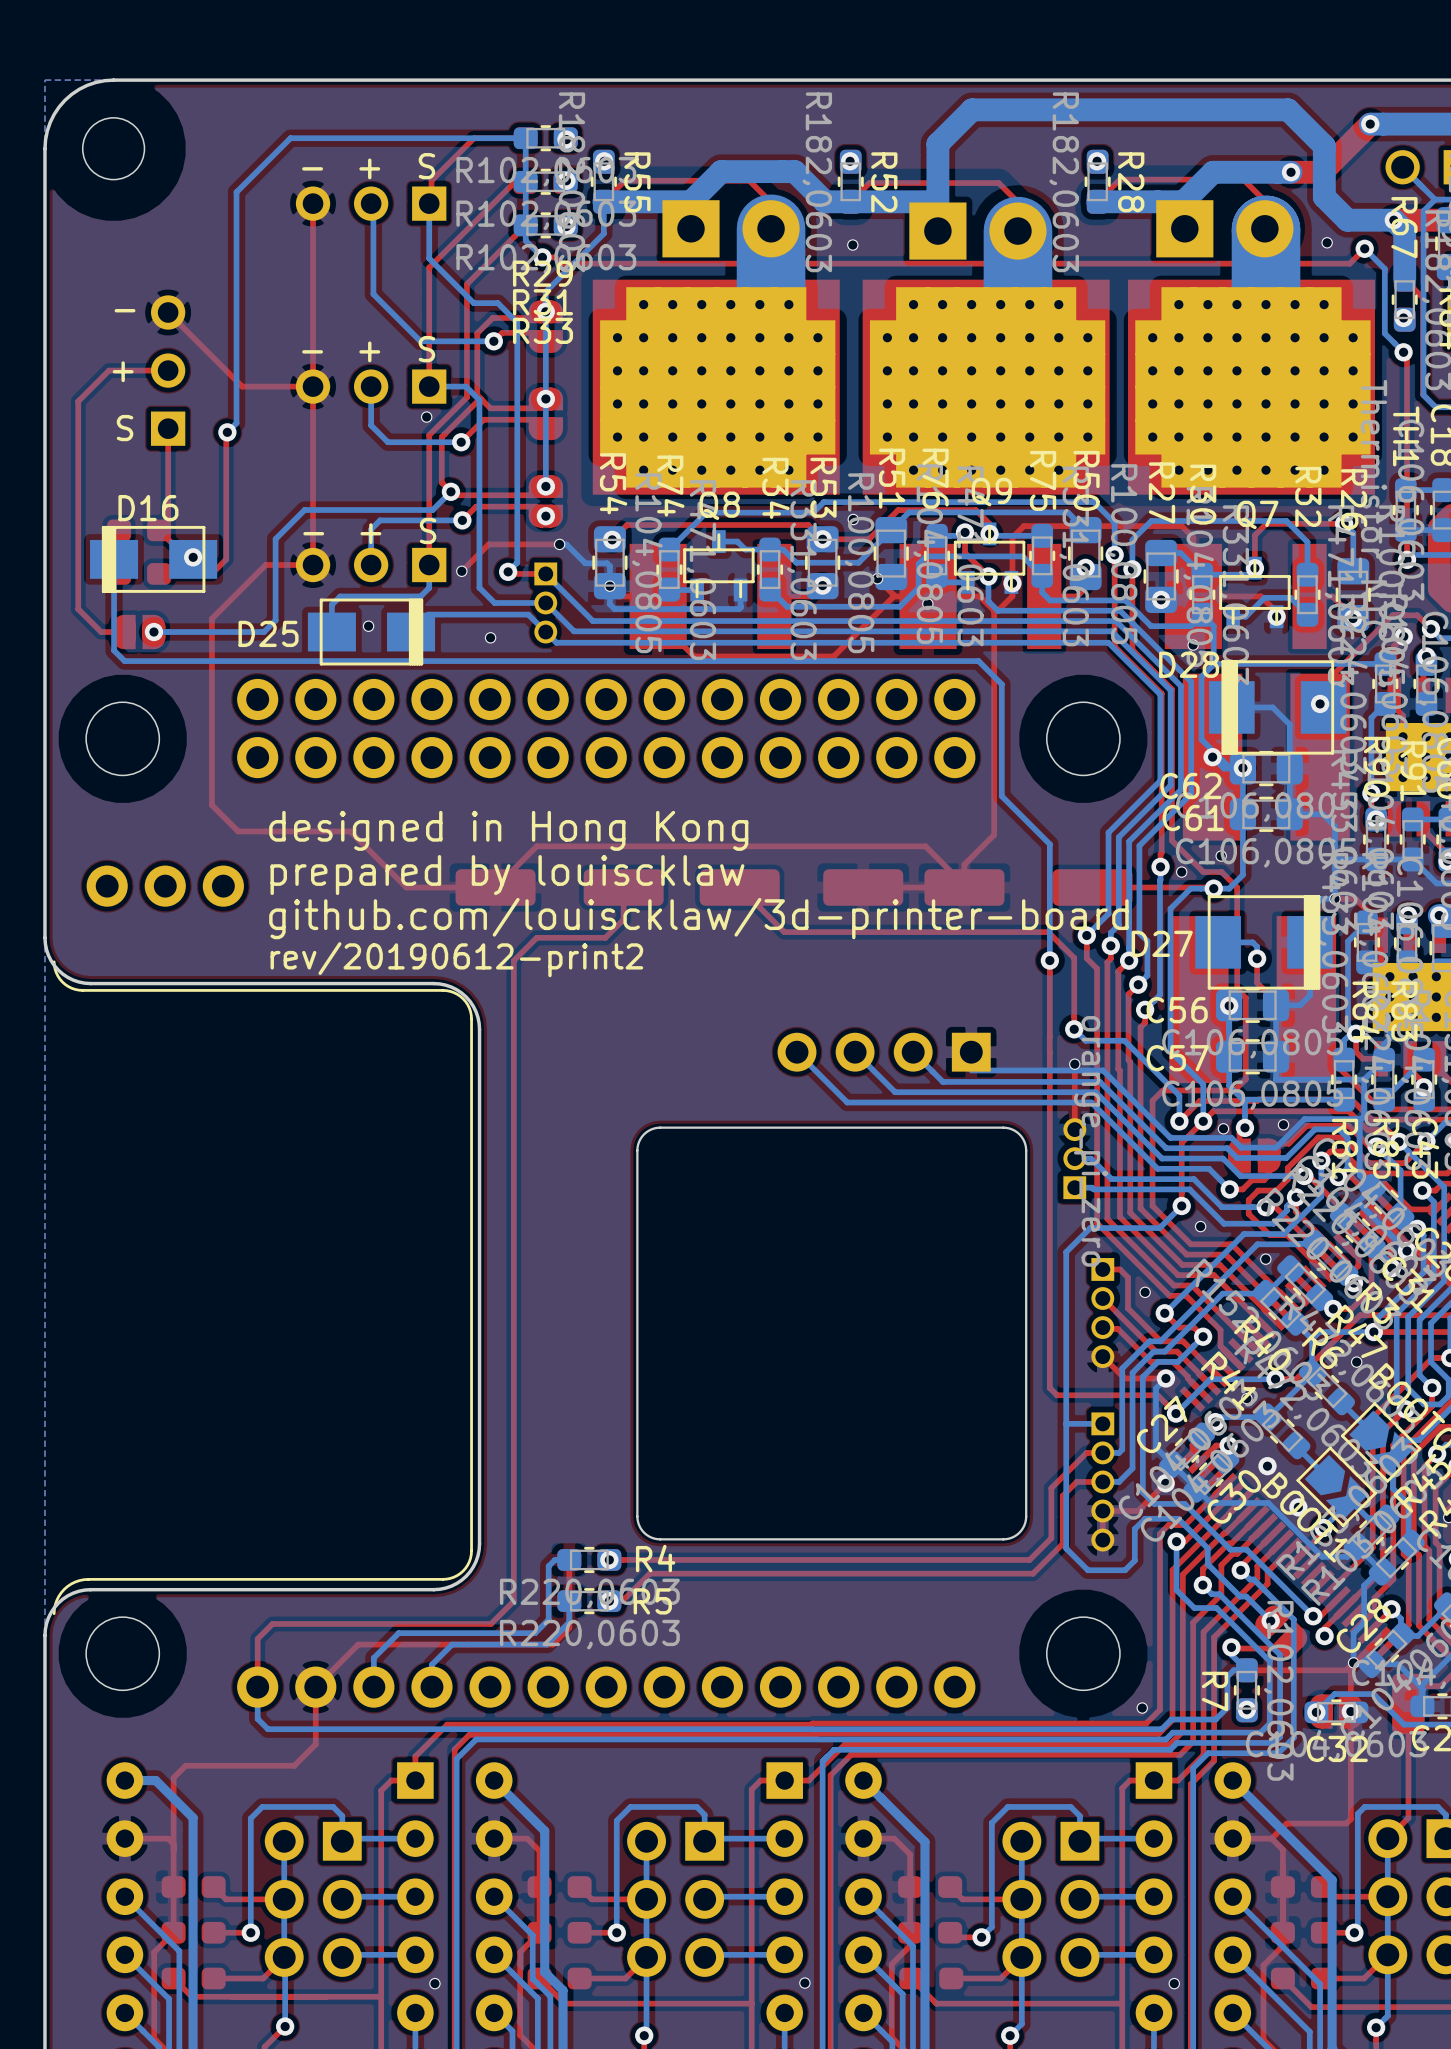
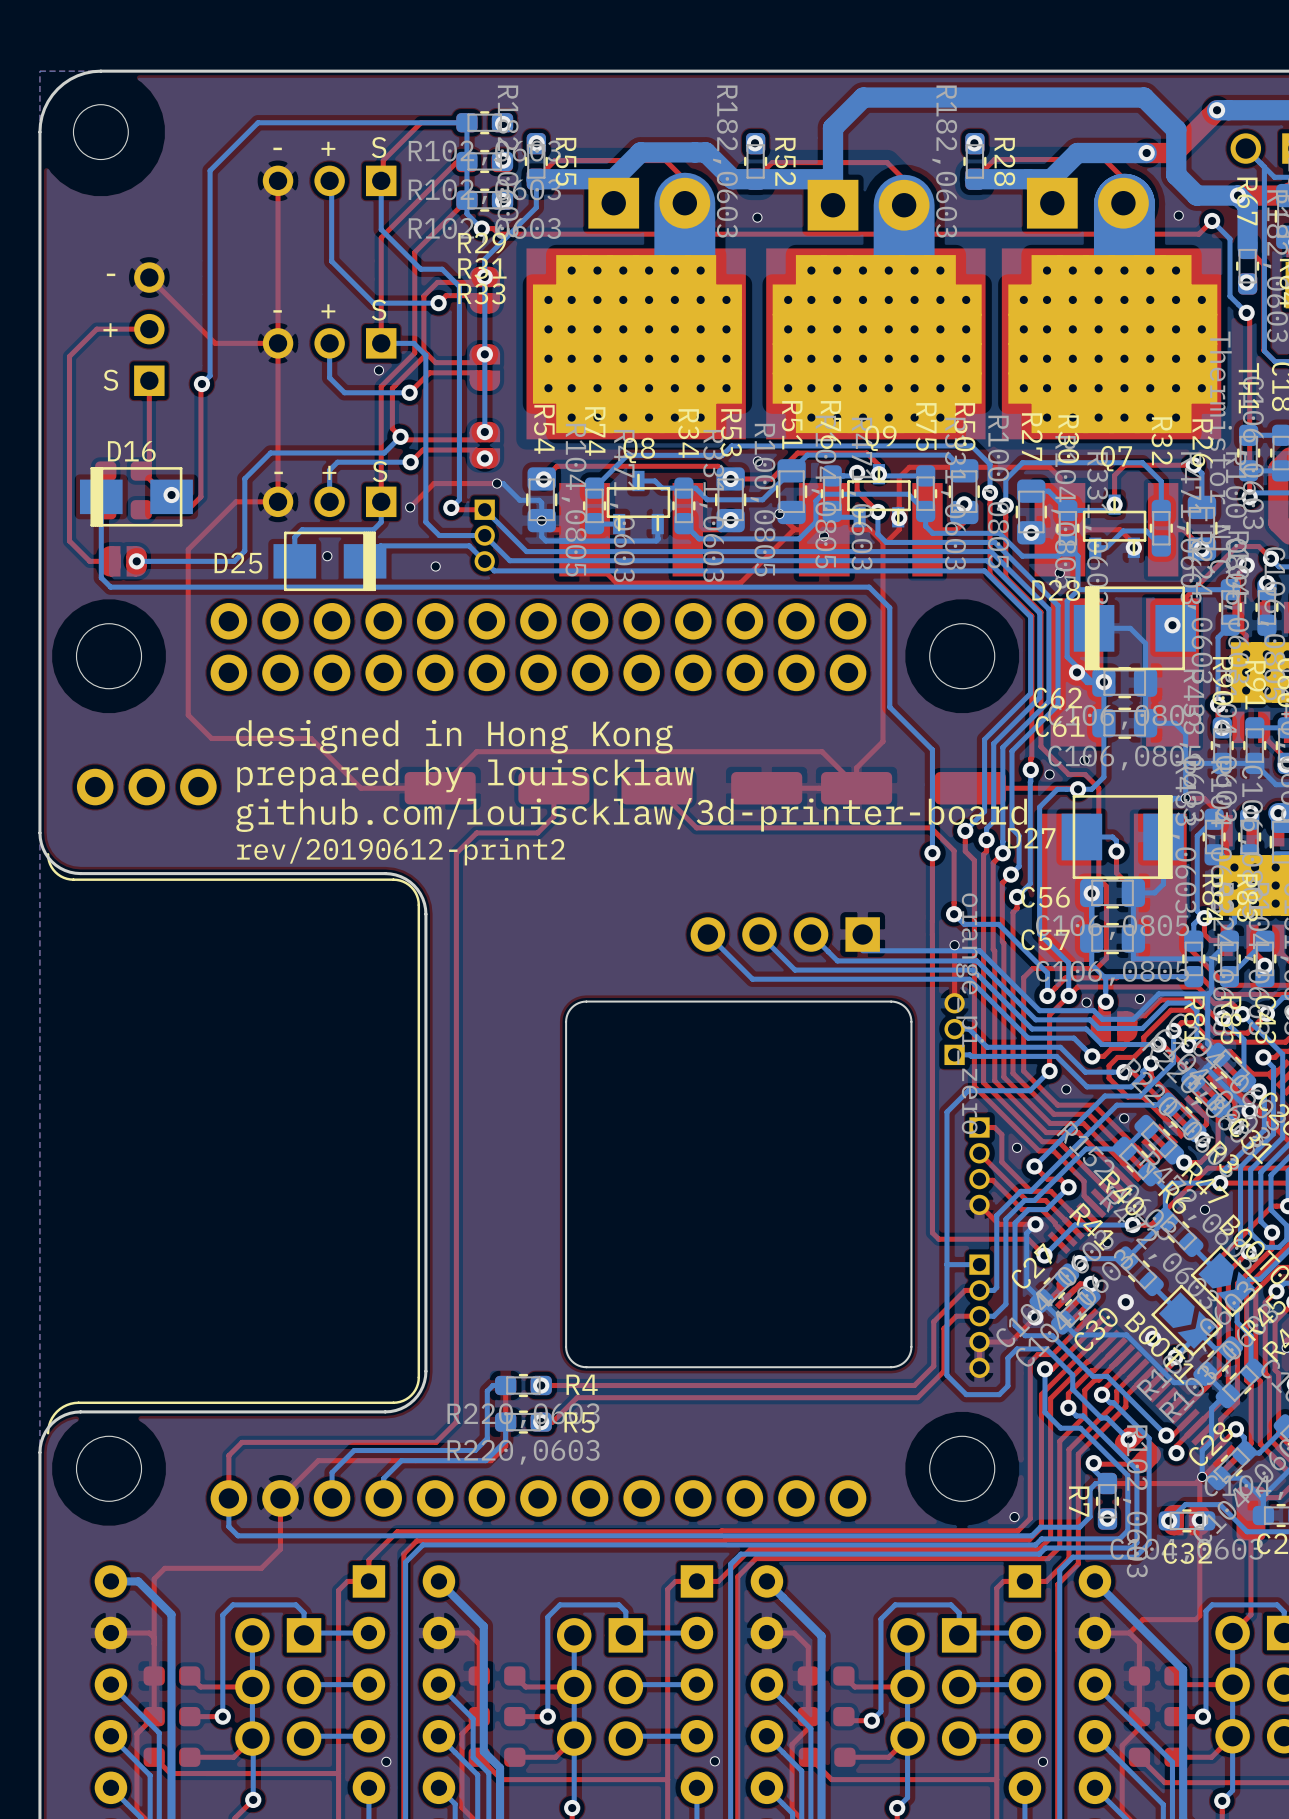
bottom track: (1435, 199) (1423, 211) -> (1264, 167) (1264, 187)

